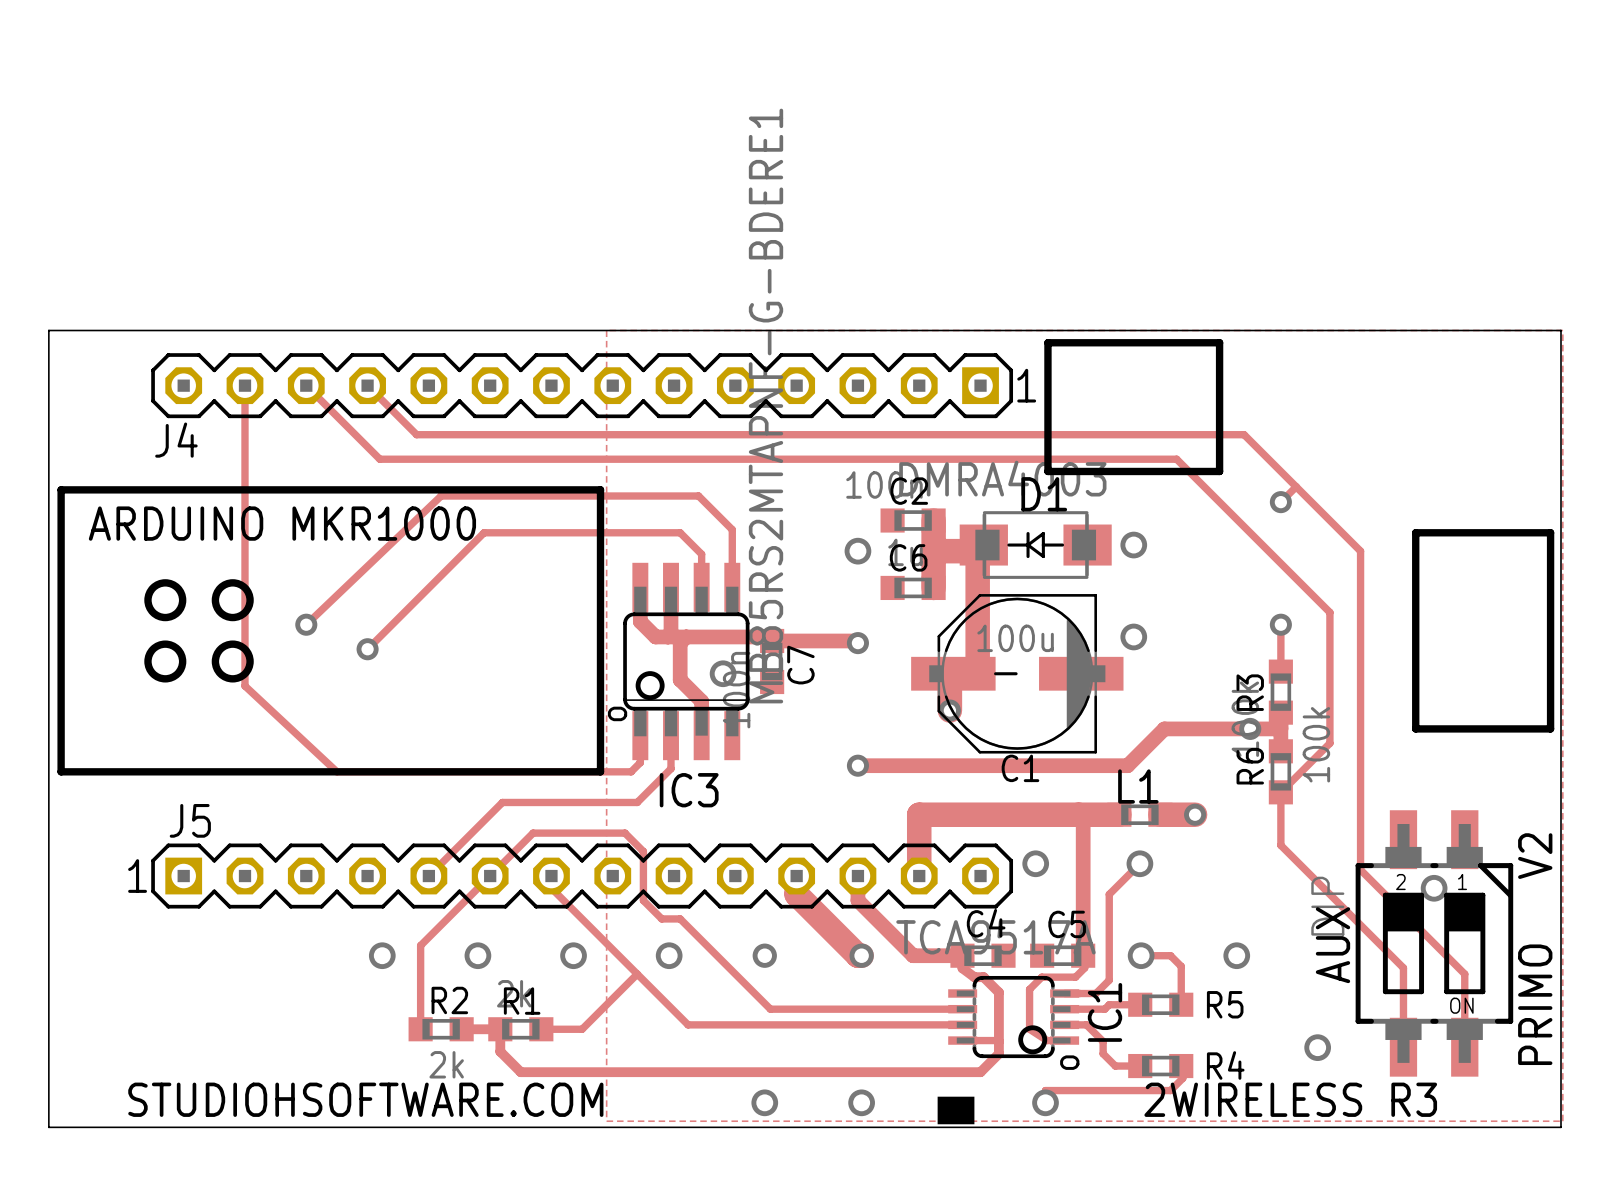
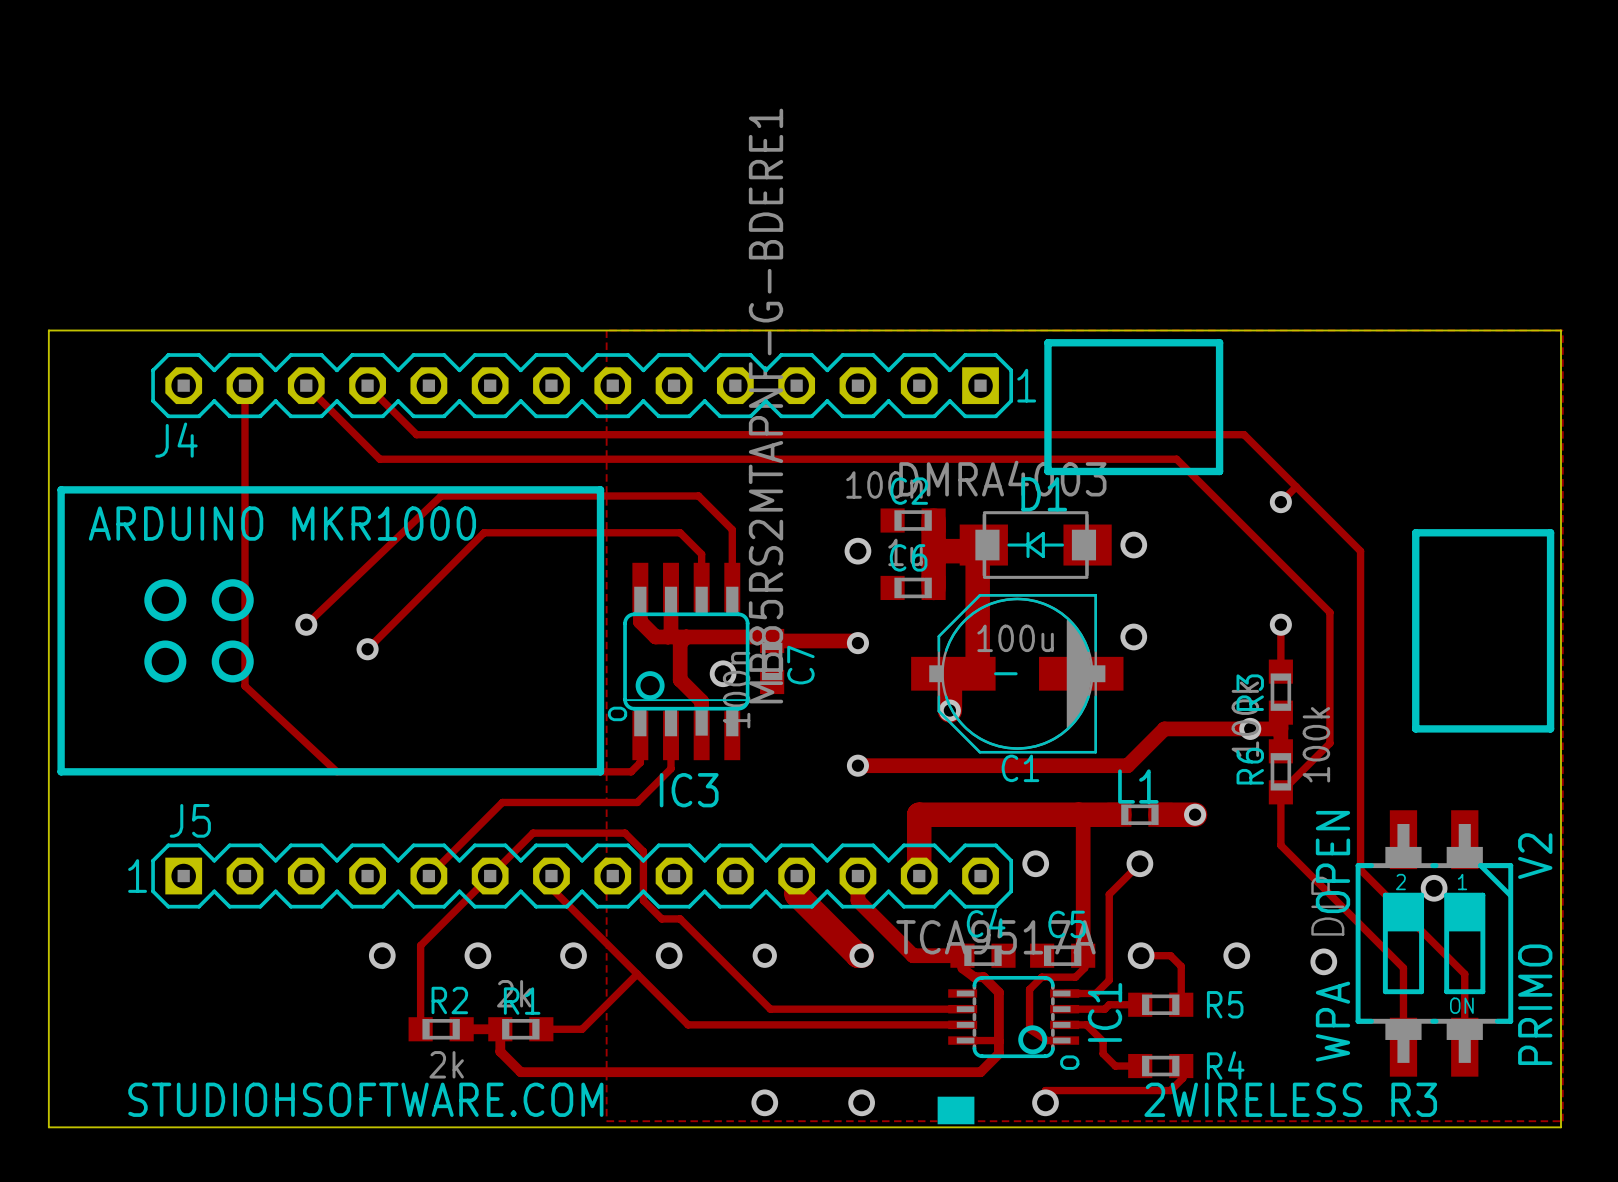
text: none -> OPEN (1332, 862)
text: AUX (1332, 945) -> none
text: none -> WPA (1332, 1021)
via position: (1317, 1047) -> (1323, 961)

